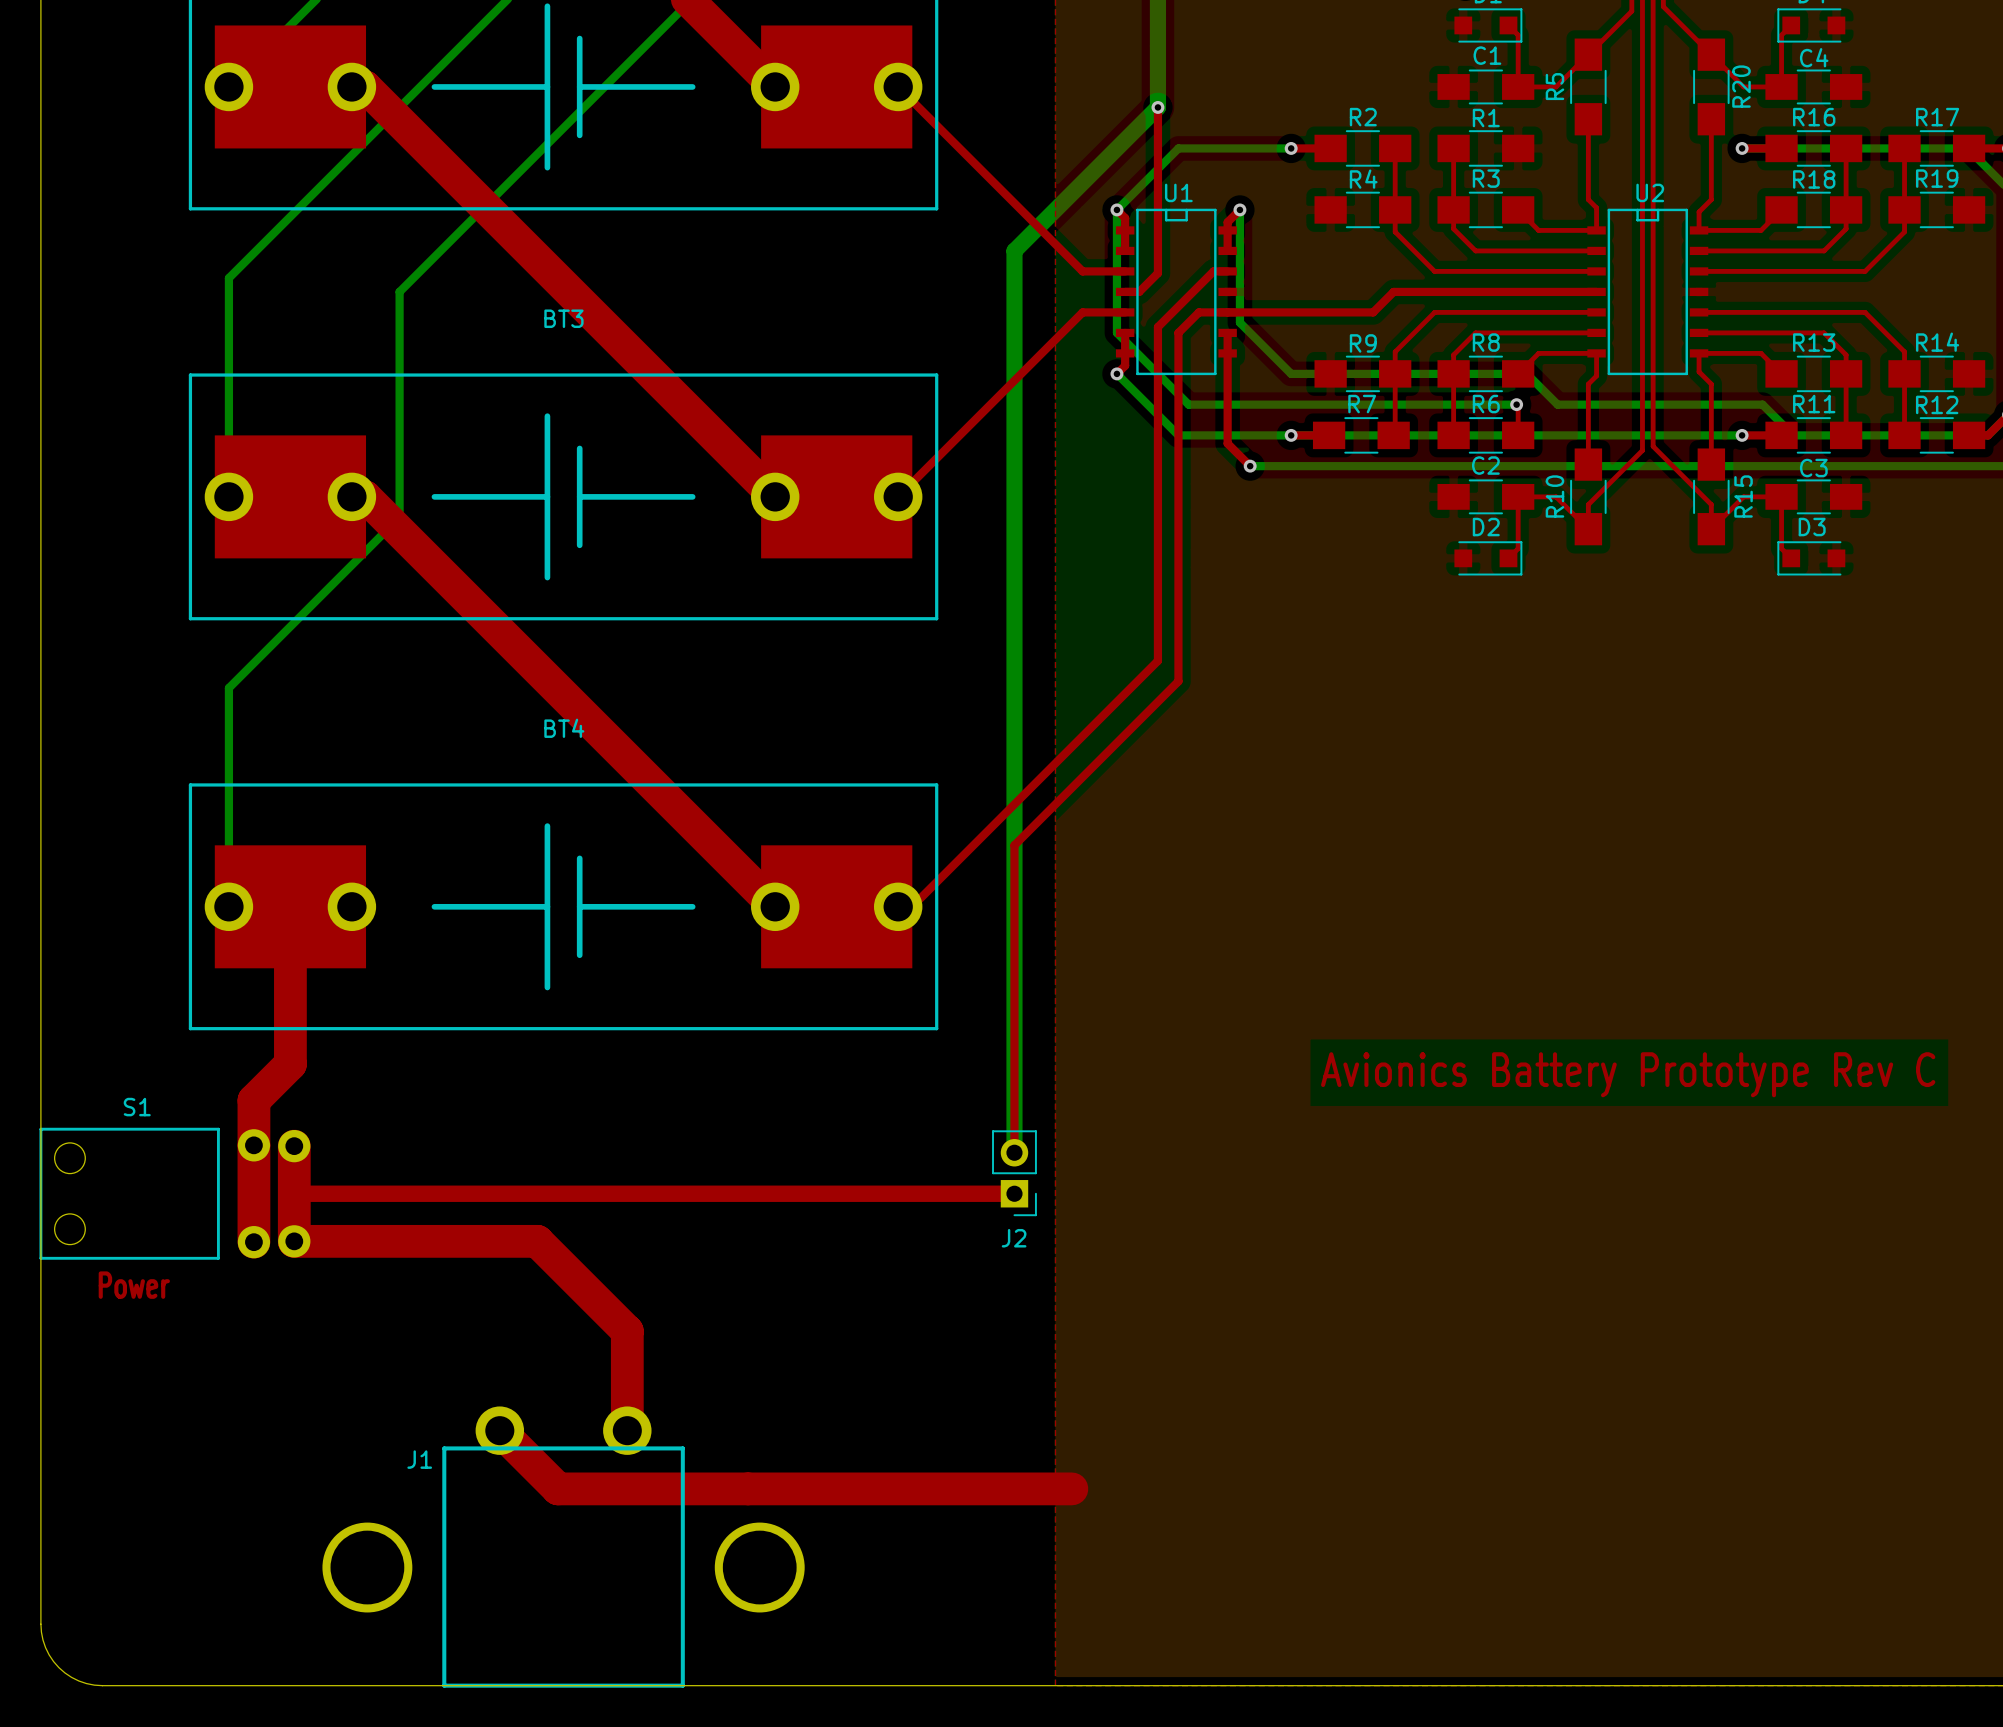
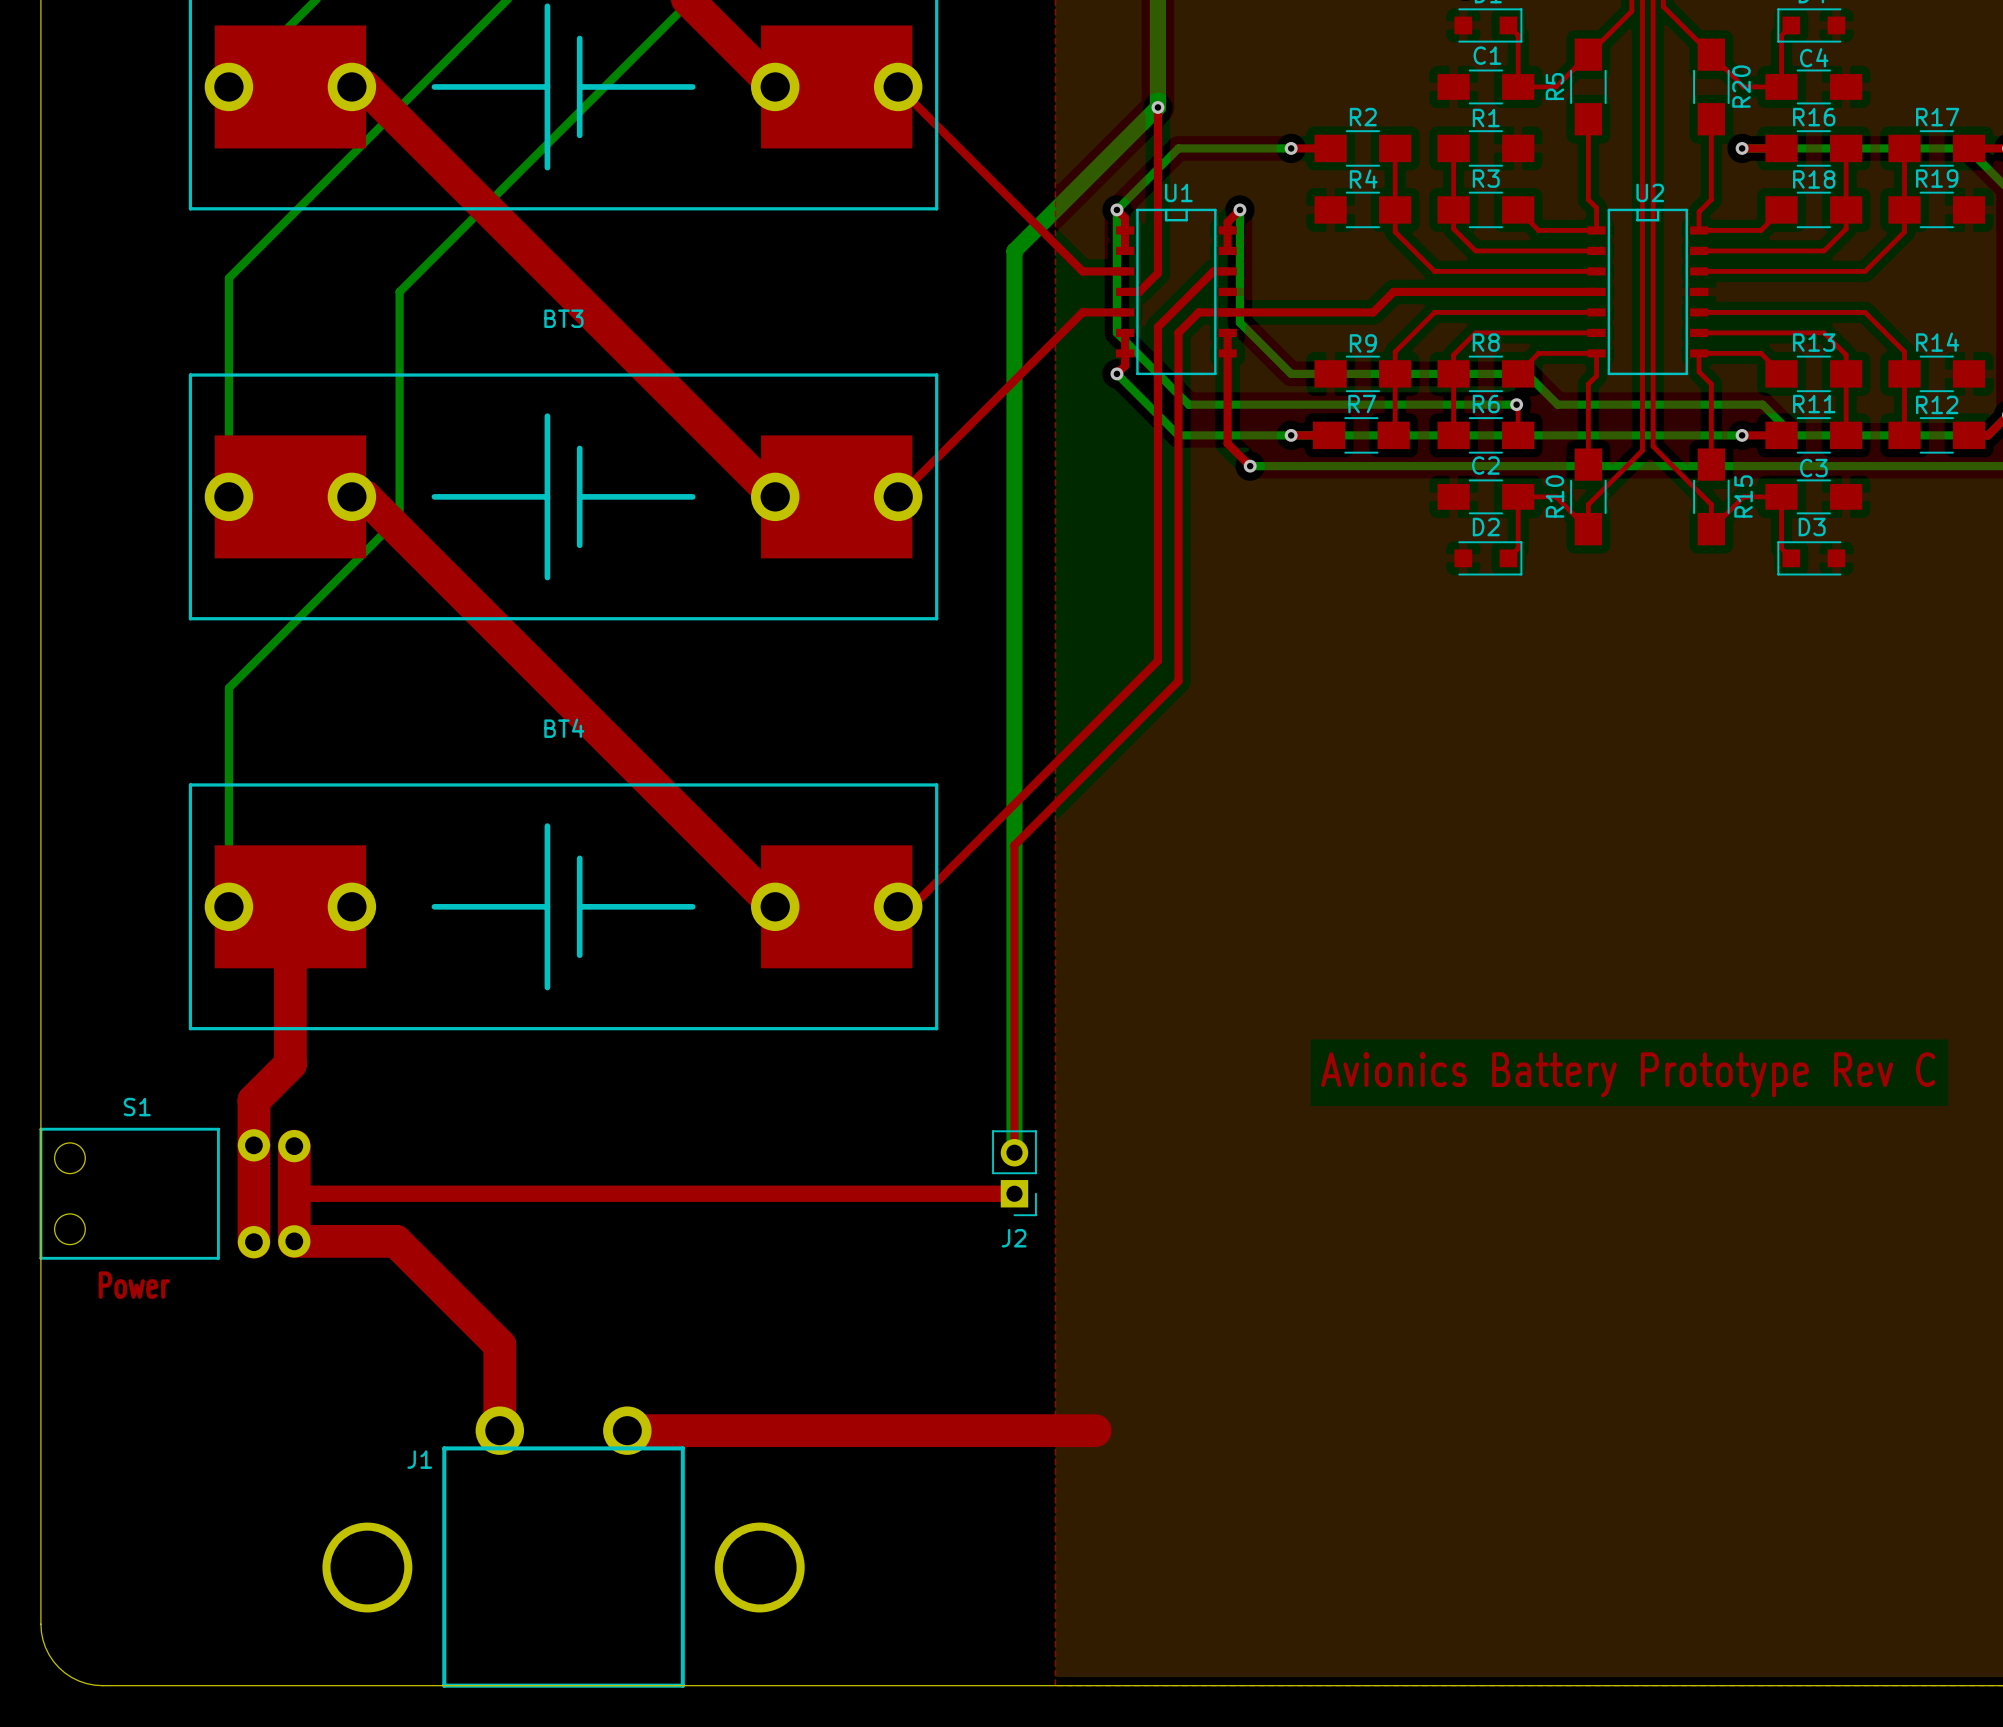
top track: (395, 1241) (537, 1241) (627, 1331) (627, 1430) -> (395, 1241) (499, 1345) (499, 1430)
top track: (499, 1430) (558, 1488) (1071, 1488) -> none
top track: none -> (627, 1430) (1095, 1430)

